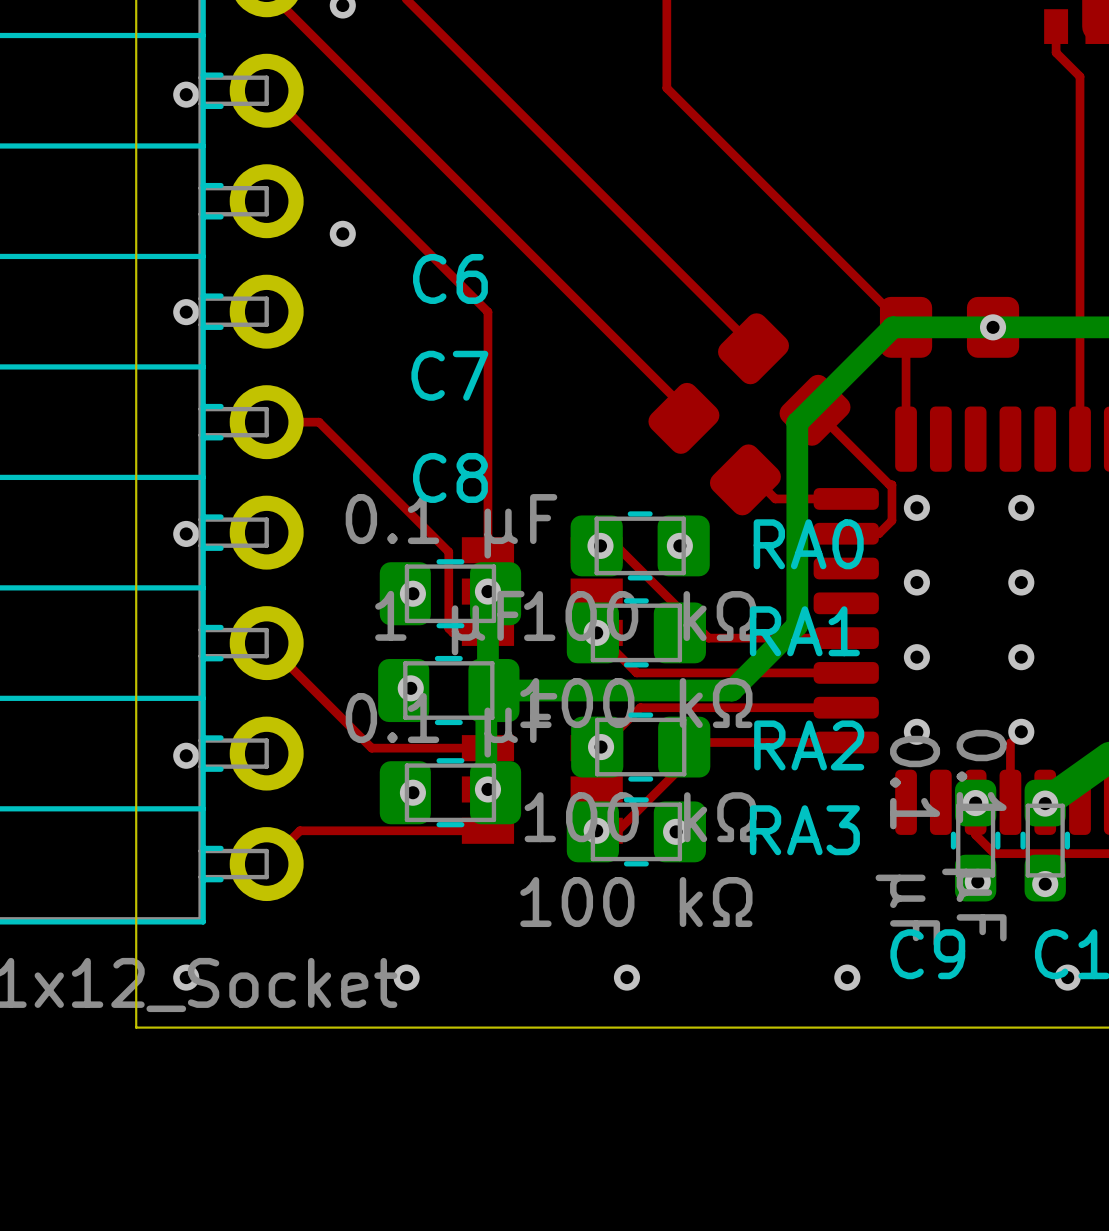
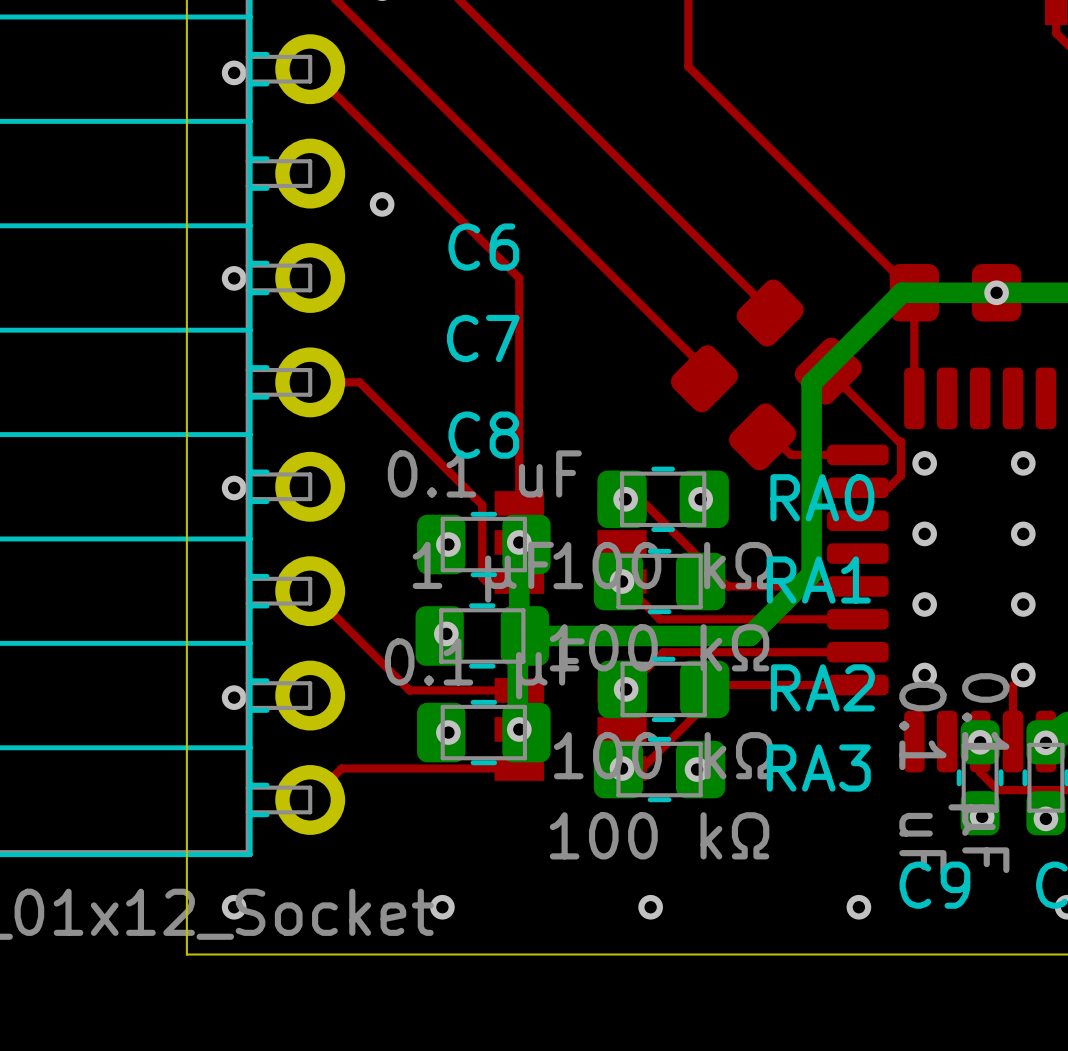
C6 value: 0.1 µF (451, 526) -> 0.1 uF (484, 473)
C9 value: 0.1 μF (907, 841) -> 0.1 uF (922, 778)

